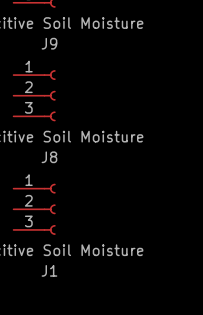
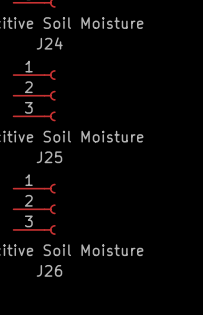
J9 name: J9 (49, 43) -> J24 (49, 43)
J8 name: J8 (49, 157) -> J25 (49, 157)
J1 name: J1 (49, 270) -> J26 (49, 270)

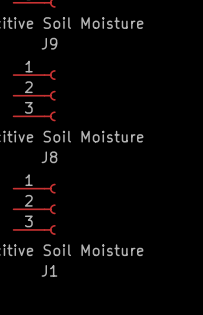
J24 name: J24 (49, 43) -> J9 (49, 43)
J25 name: J25 (49, 157) -> J8 (49, 157)
J26 name: J26 (49, 270) -> J1 (49, 270)

